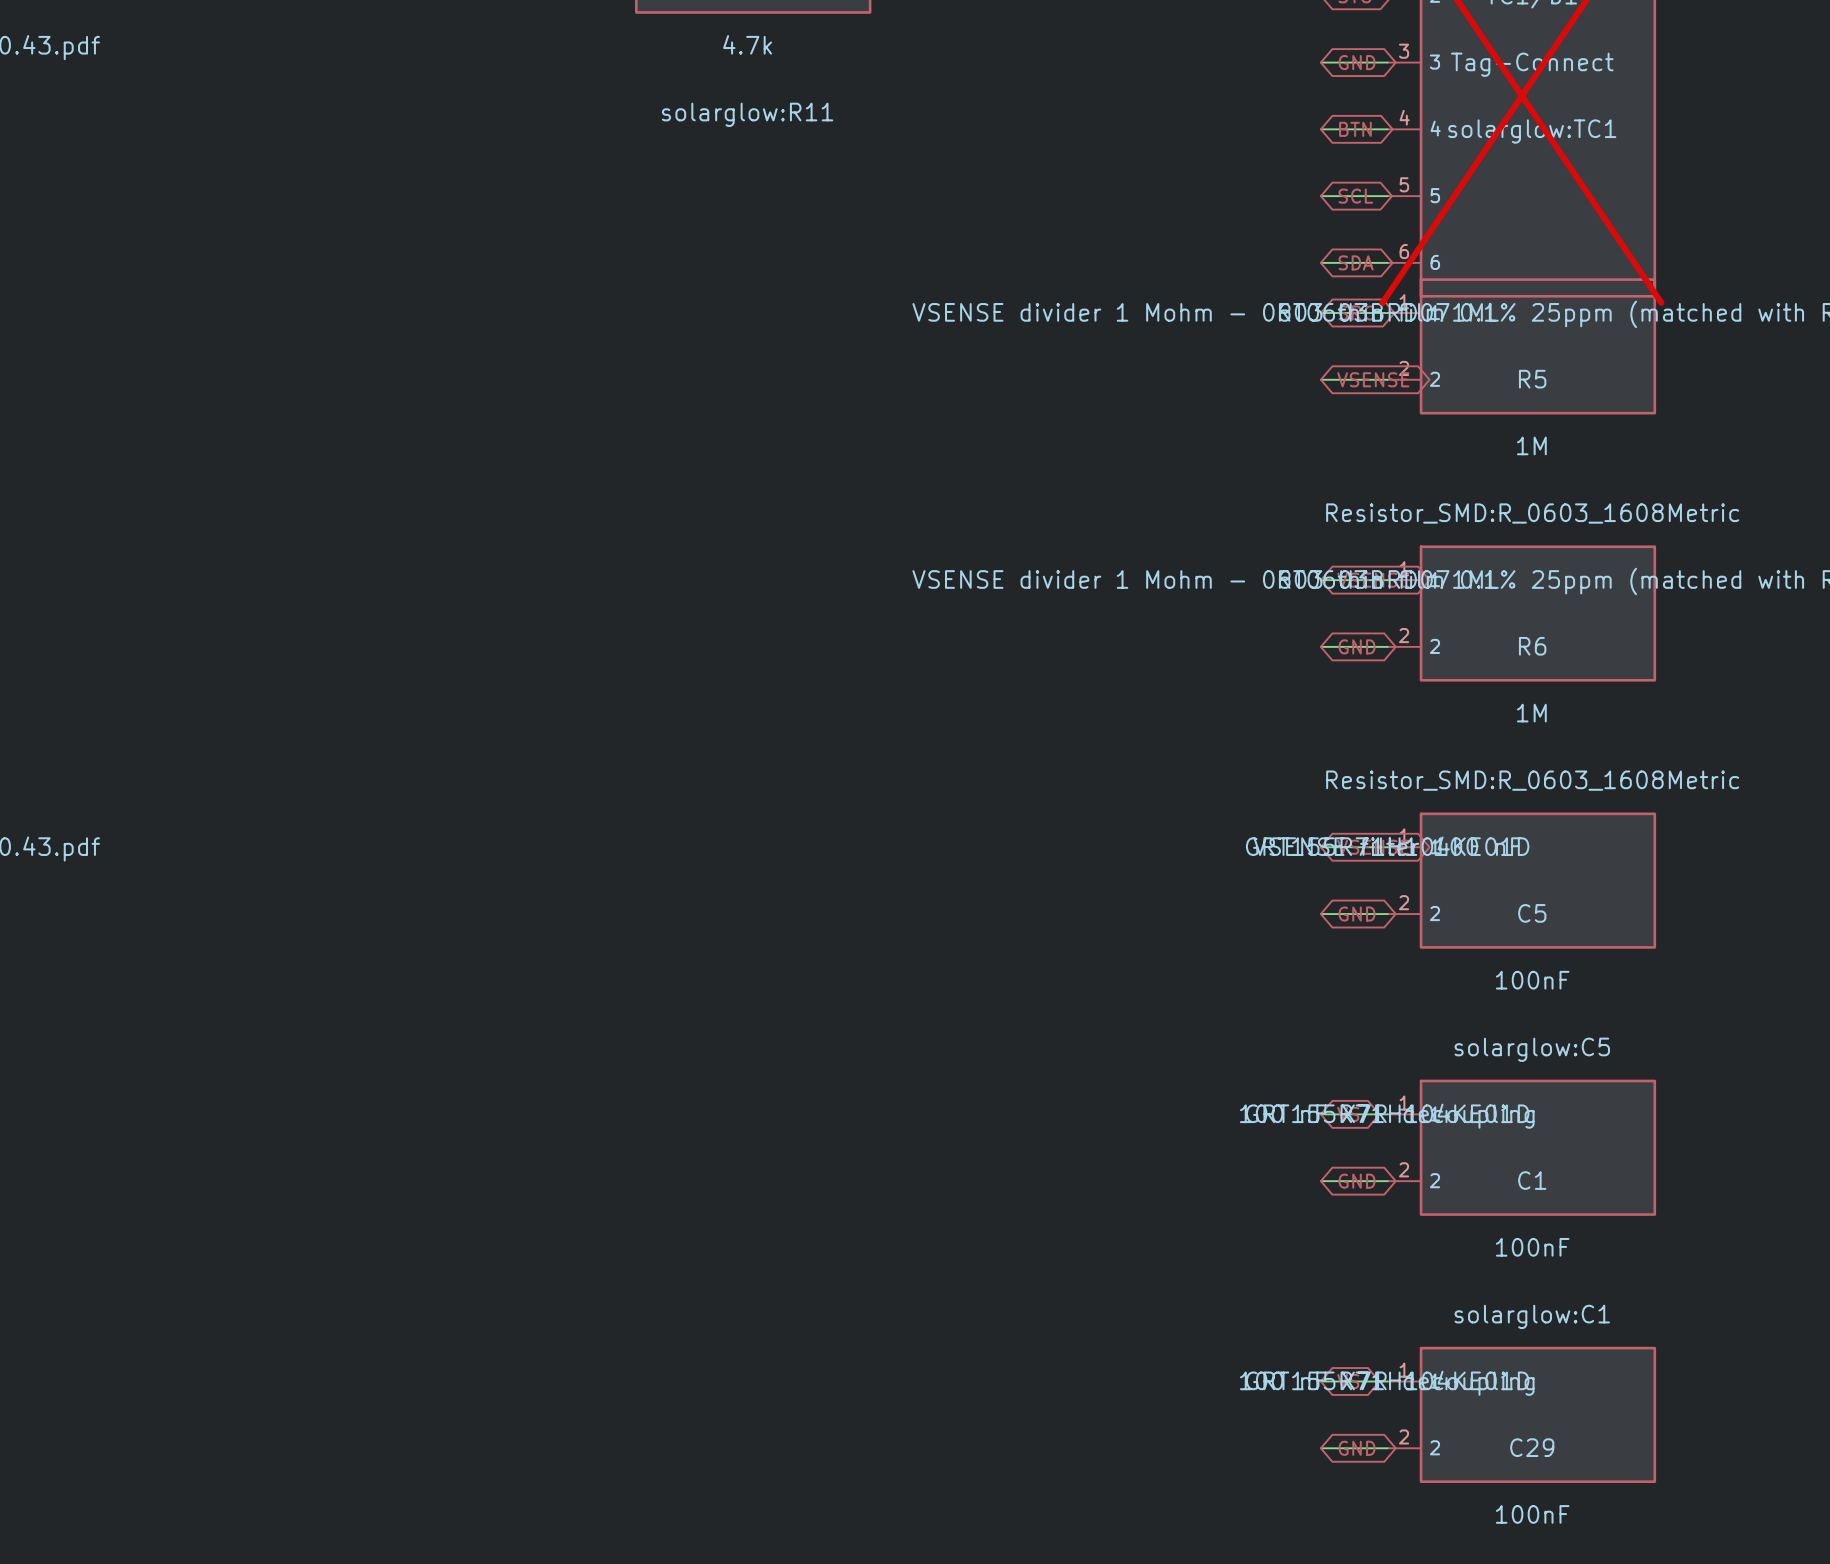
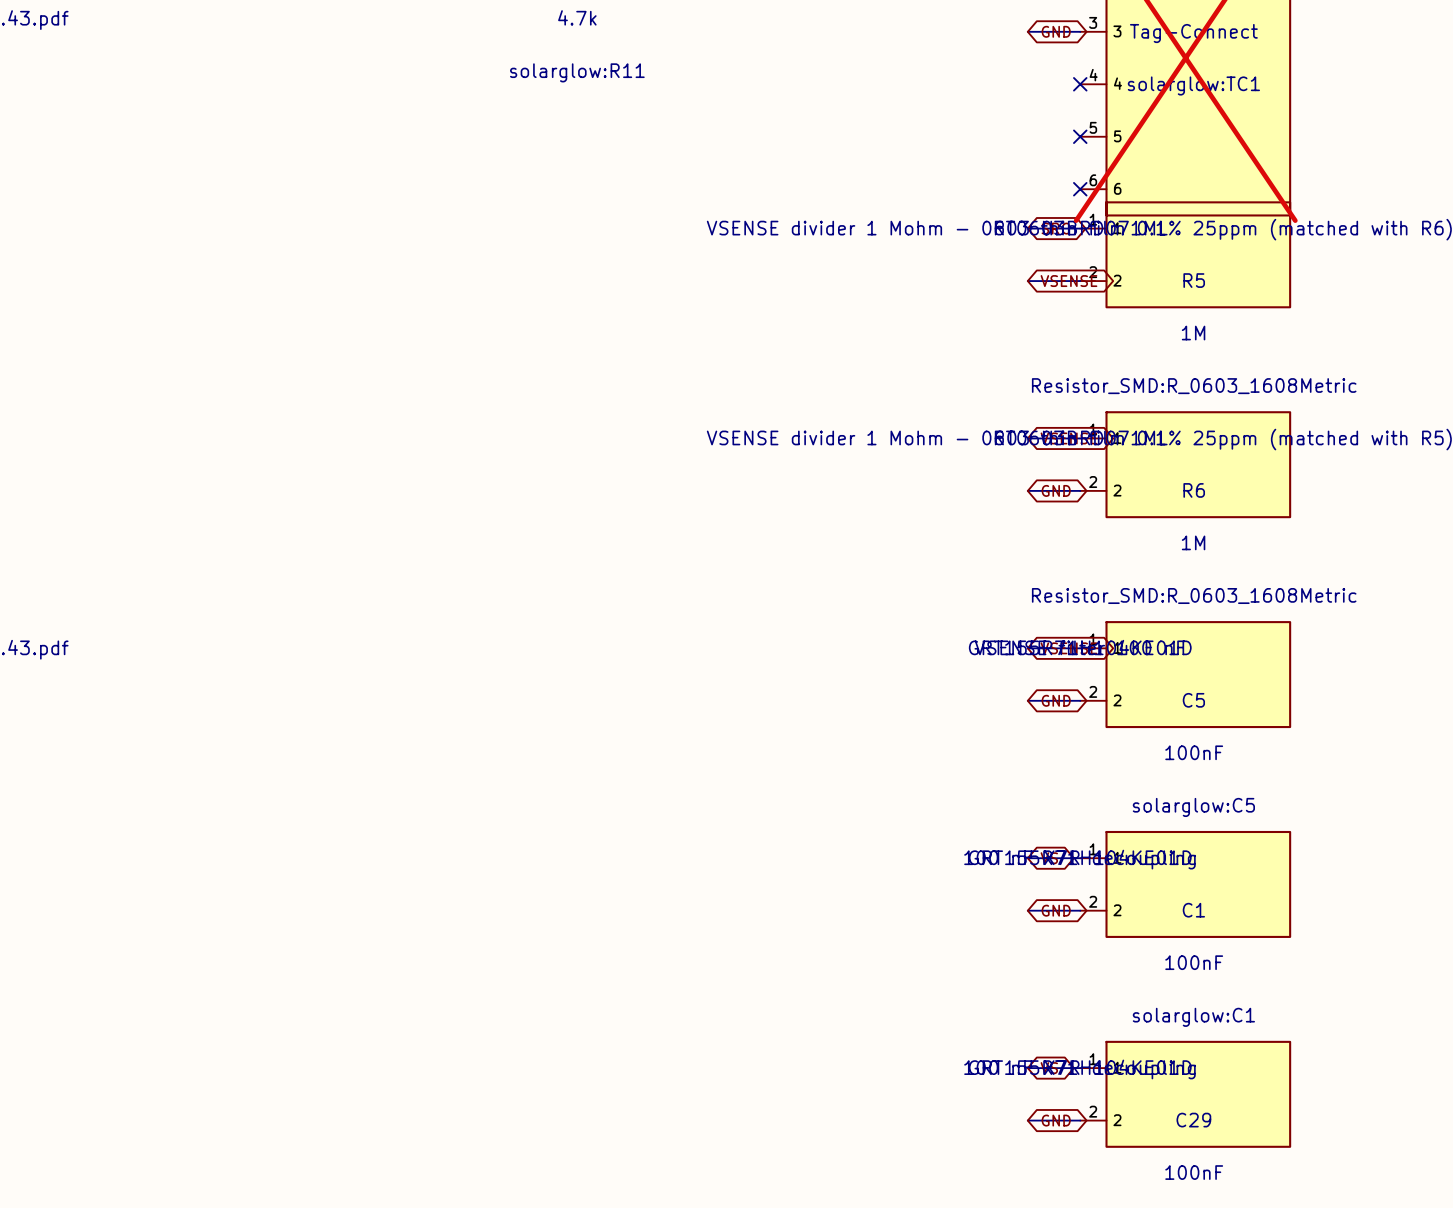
wire: (1320, 129) (1387, 129) -> none
global label: BTN (1355, 129) -> none
no-connect mark: none -> (1080, 84)
wire: (1320, 196) (1387, 196) -> none
global label: SCL (1355, 196) -> none
no-connect mark: none -> (1080, 136)
wire: (1320, 262) (1387, 262) -> none
global label: SDA (1356, 262) -> none
no-connect mark: none -> (1080, 189)

